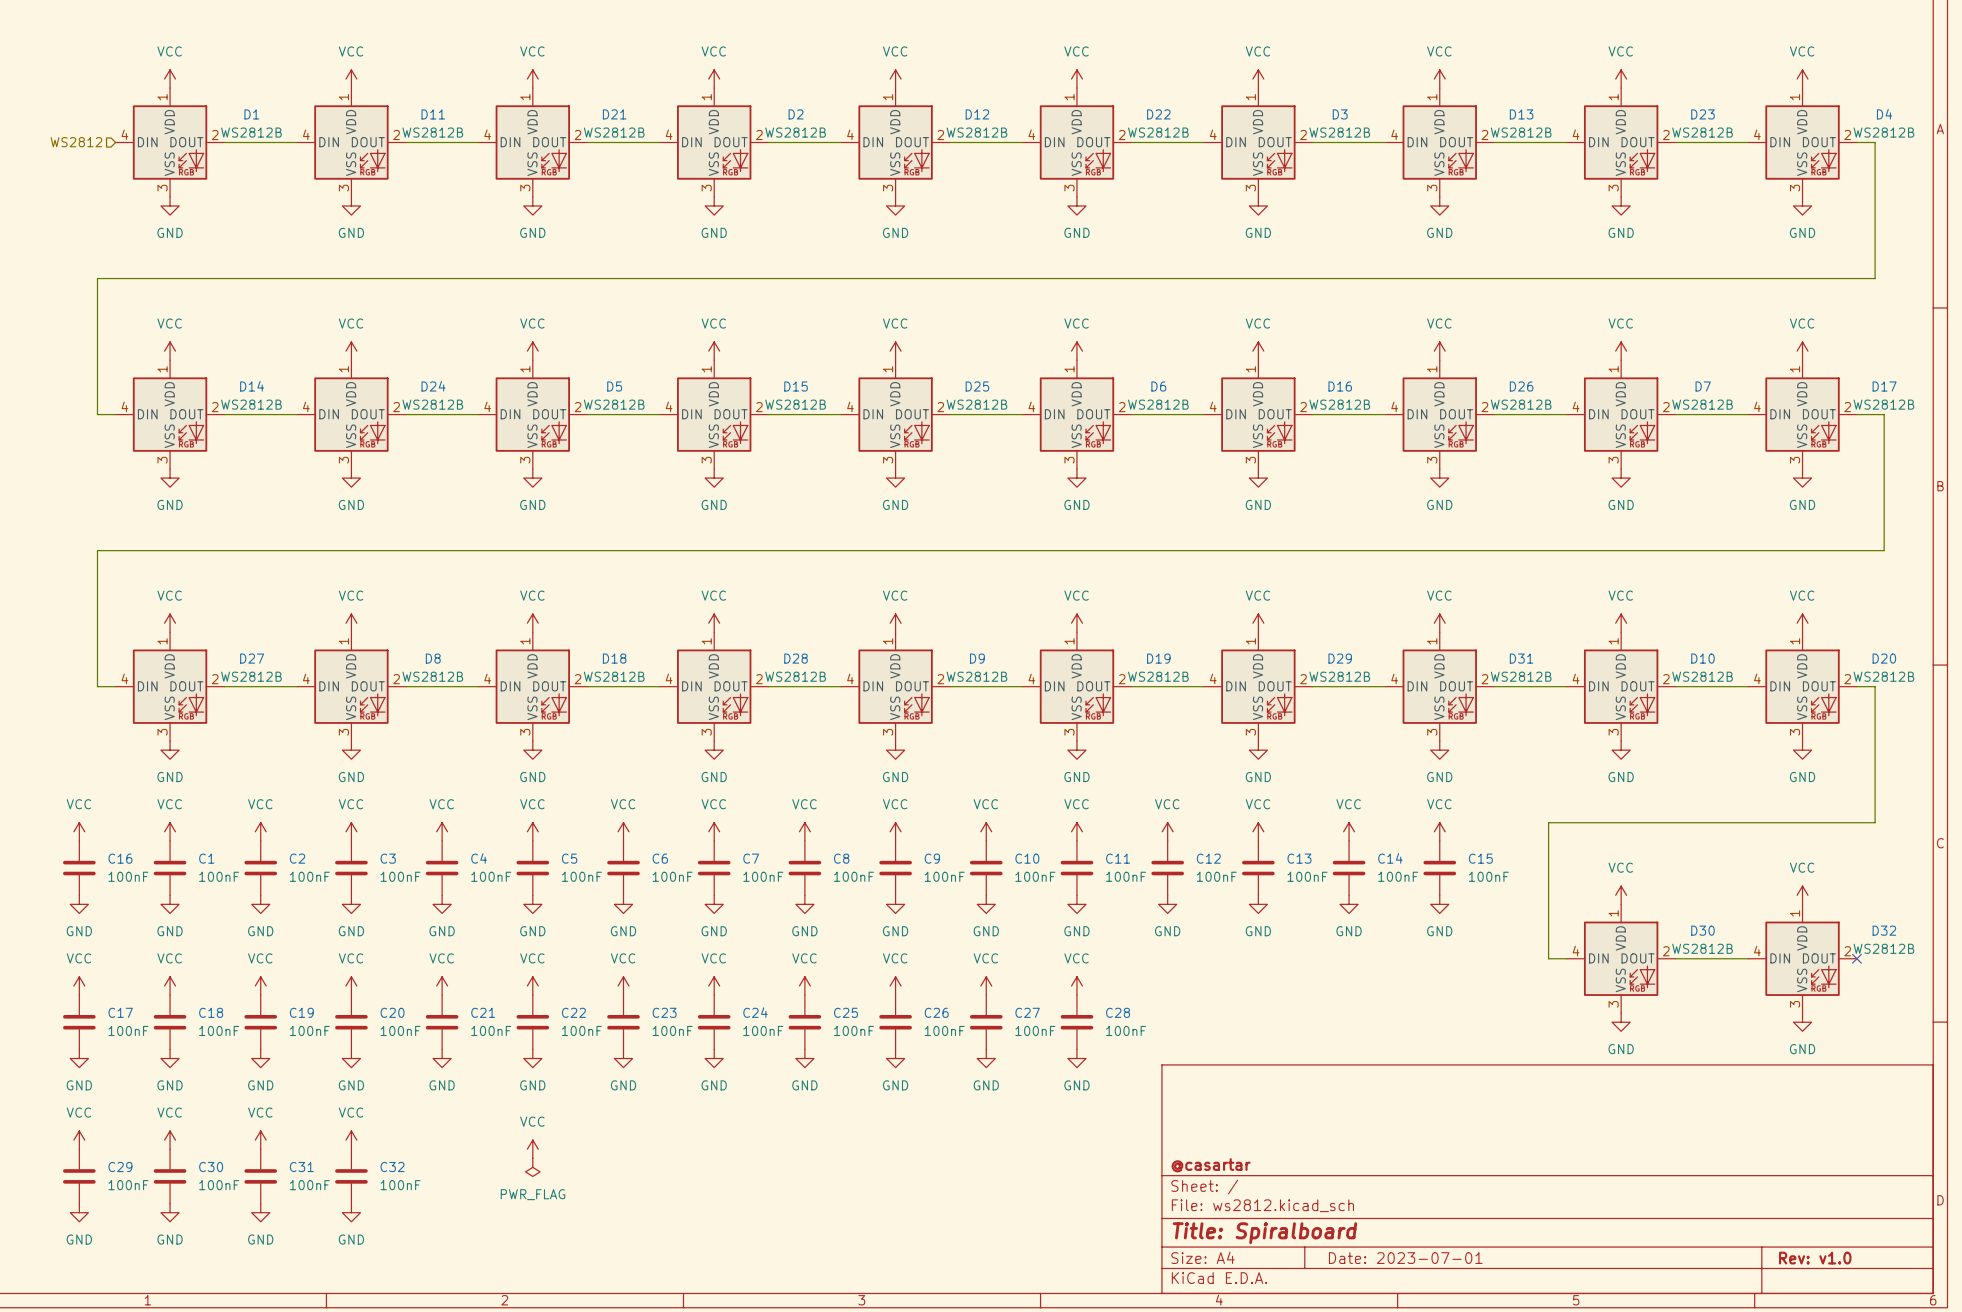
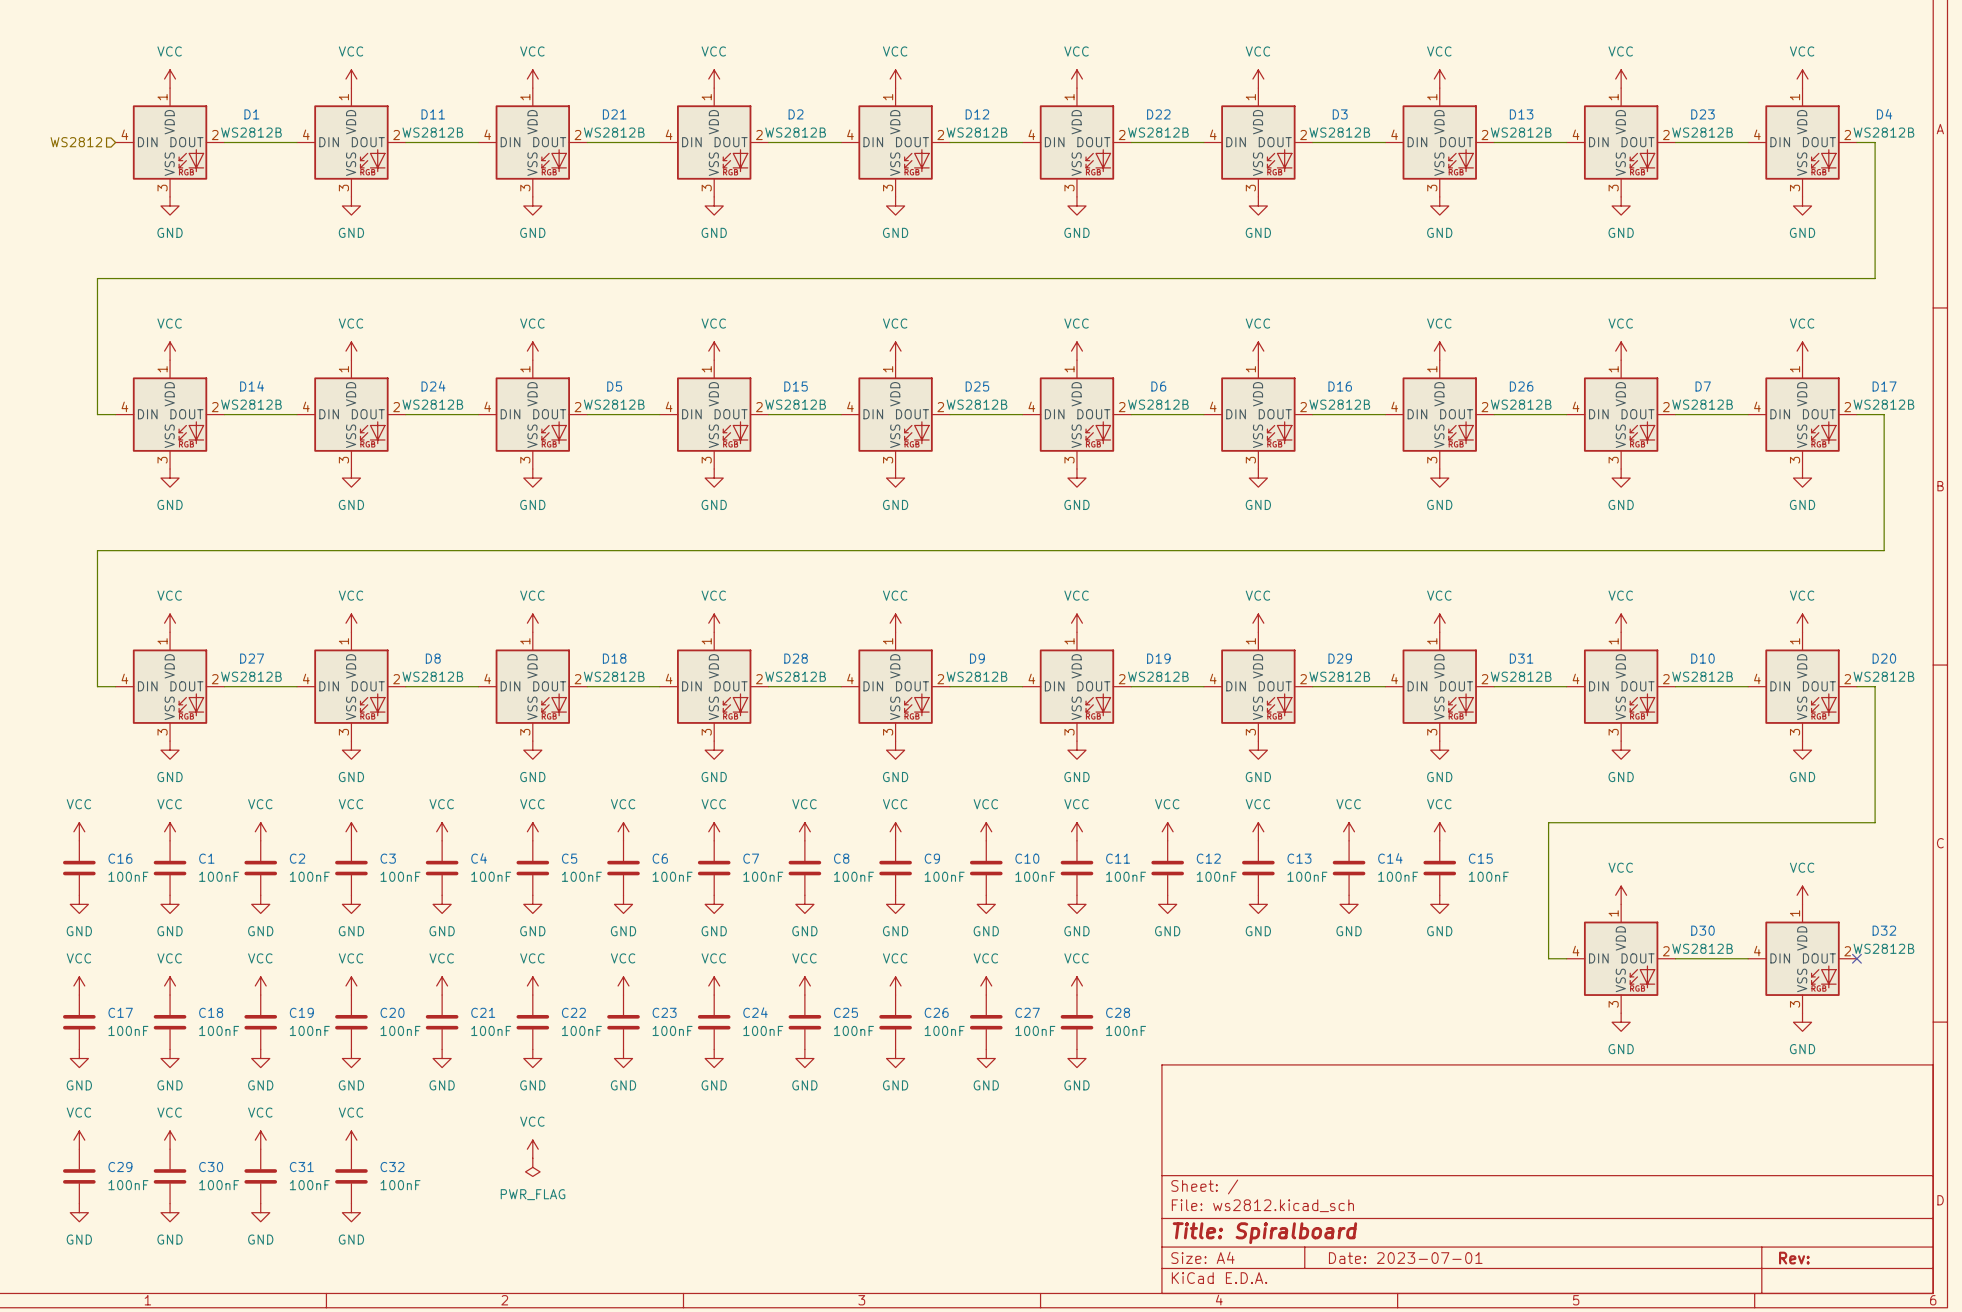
title block: @casartar (1211, 1165) -> none
title block: Rev: v1.0 (1815, 1258) -> Rev: (1794, 1258)

